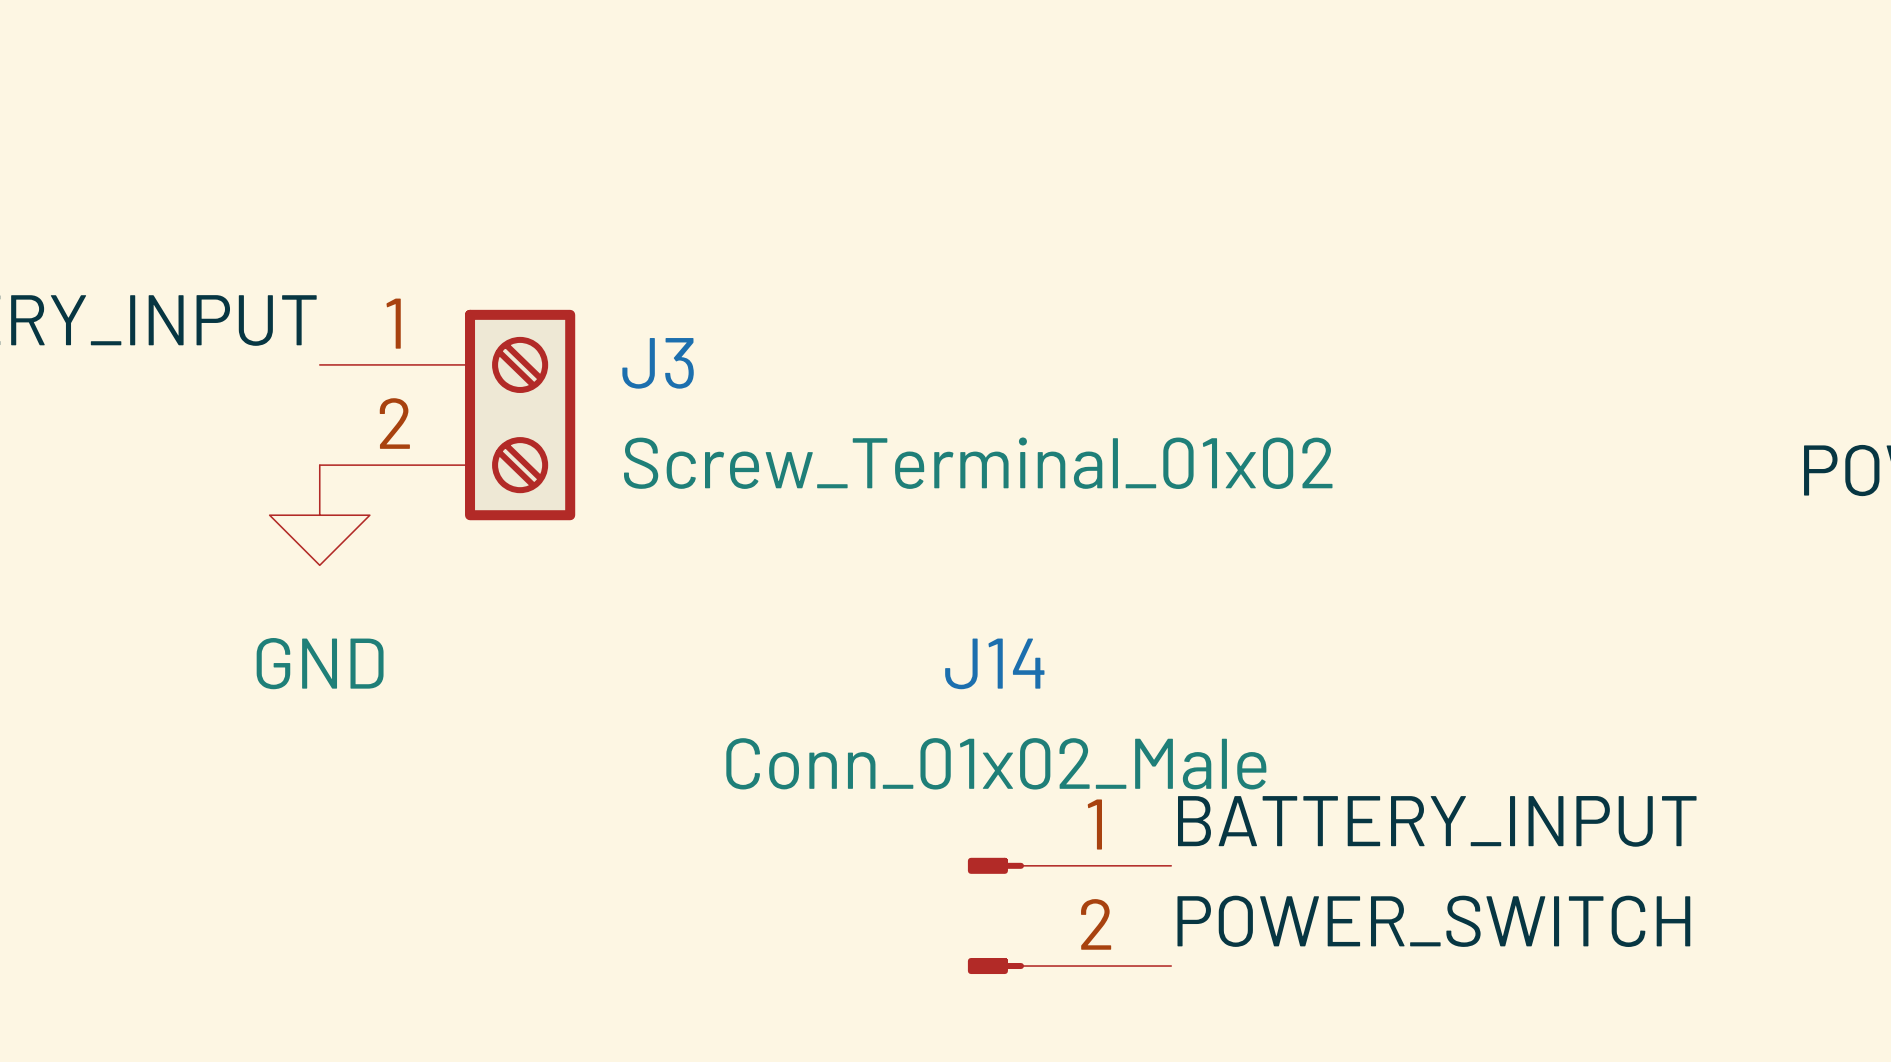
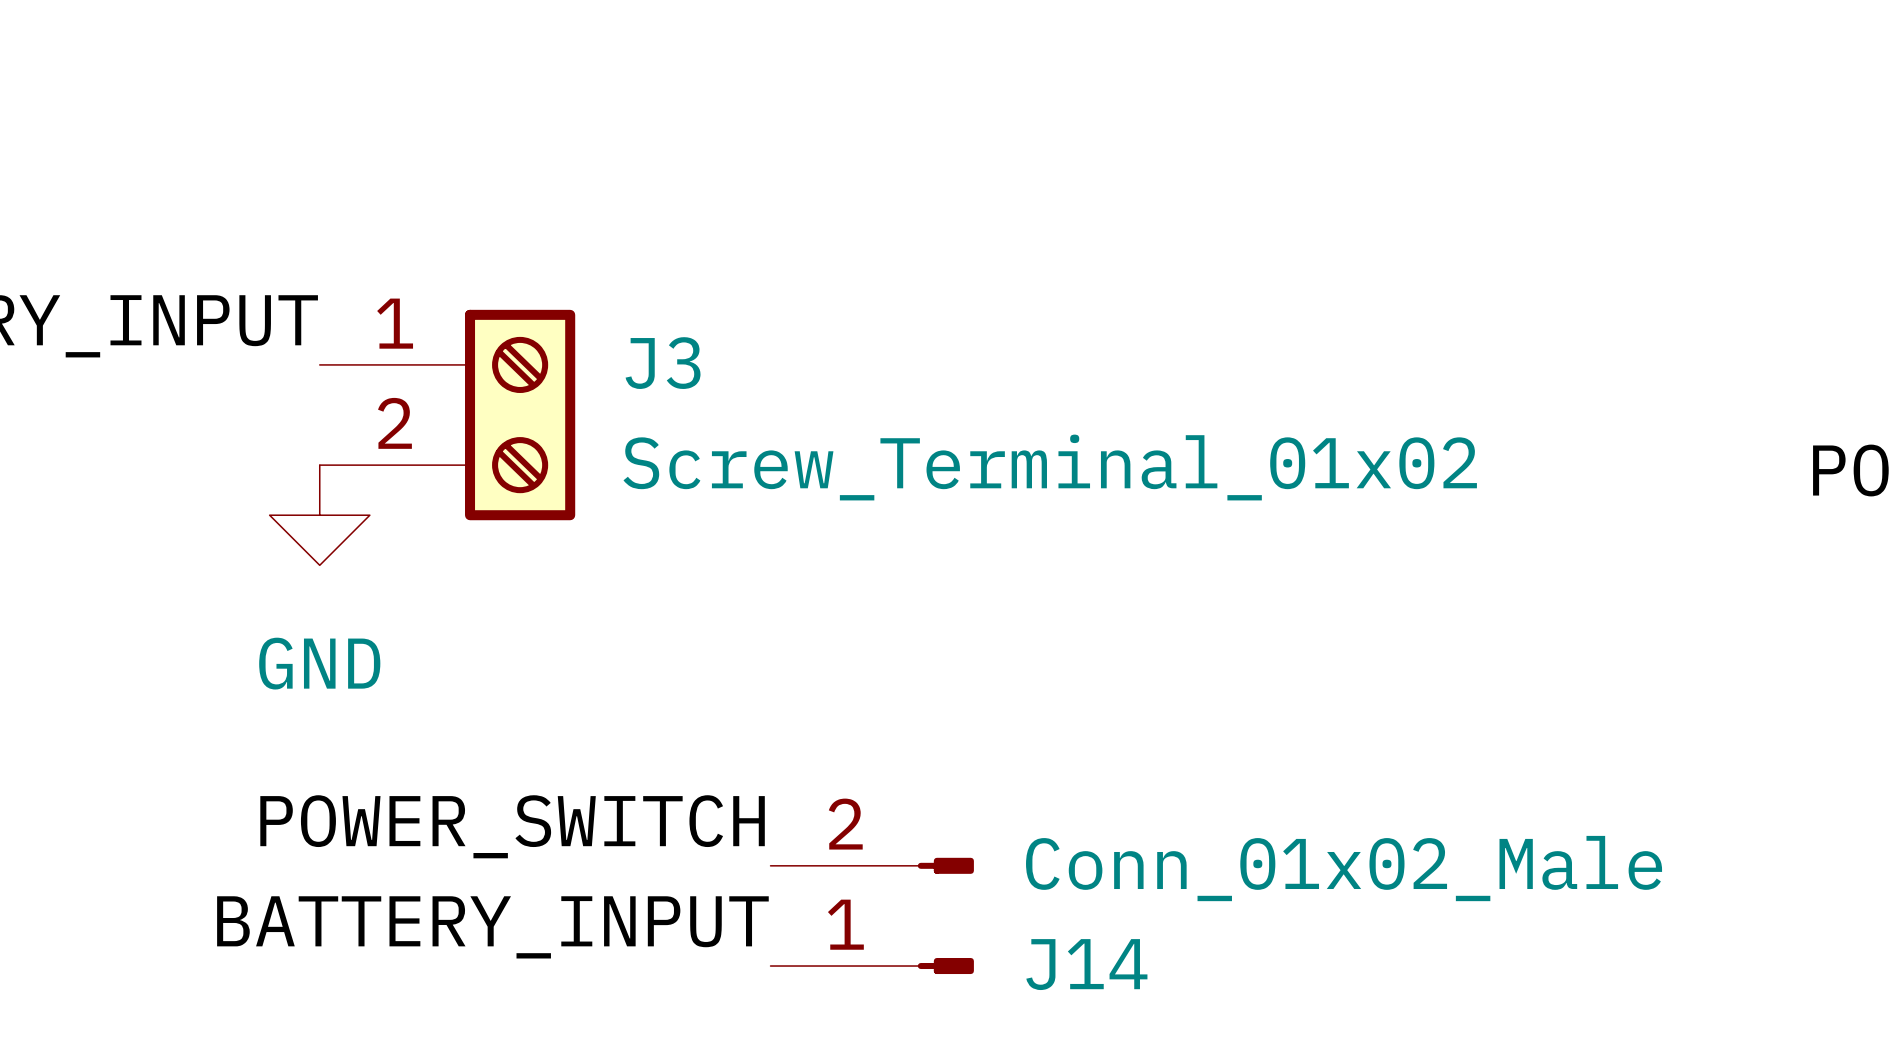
J14 name position: J14 (994, 663) -> J14 (1086, 964)
J14 value position: Conn_01x02_Male (996, 763) -> Conn_01x02_Male (1344, 868)
label position: BATTERY_INPUT (1437, 821) -> BATTERY_INPUT (492, 927)
J14 rotation: 0° (995, 915) -> 180° (945, 915)
J14 position: (1069, 915) -> (872, 915)
label position: POWER_SWITCH (1433, 921) -> POWER_SWITCH (512, 826)

